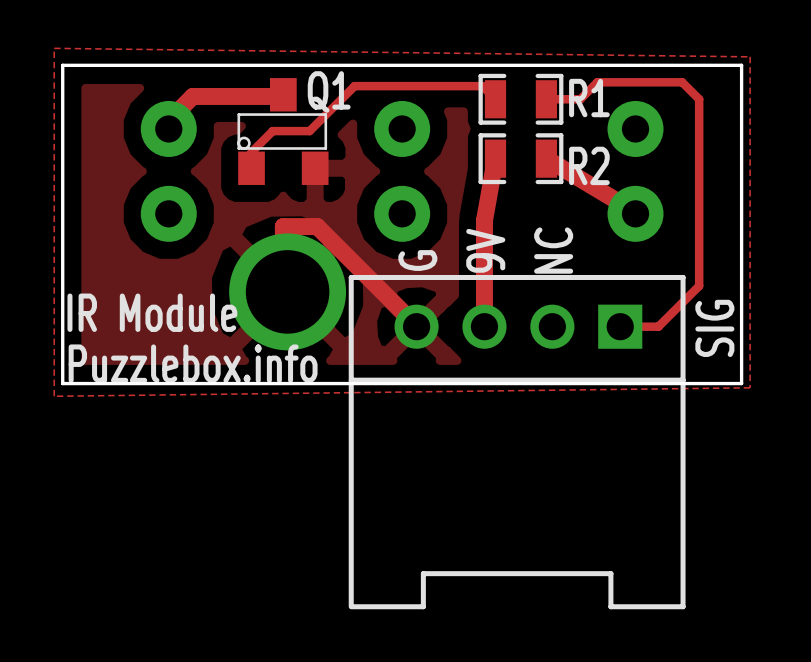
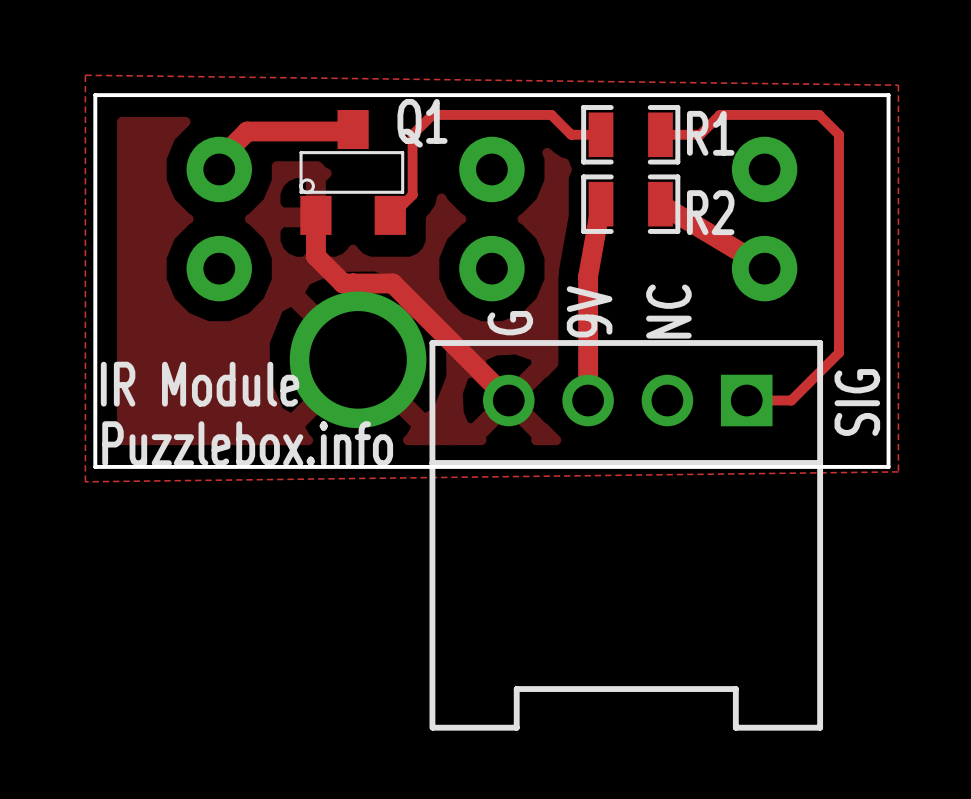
Q1 name position: Q1 (329, 91) -> Q1 (422, 123)
track: (495, 99) (482, 86) (354, 86) (309, 131) (272, 131) (251, 152) (251, 168) -> (600, 134) (571, 134) (551, 114) (432, 114) (412, 134) (412, 195) (390, 217)
track: none -> (315, 217) (315, 256) (343, 283) (353, 283)

